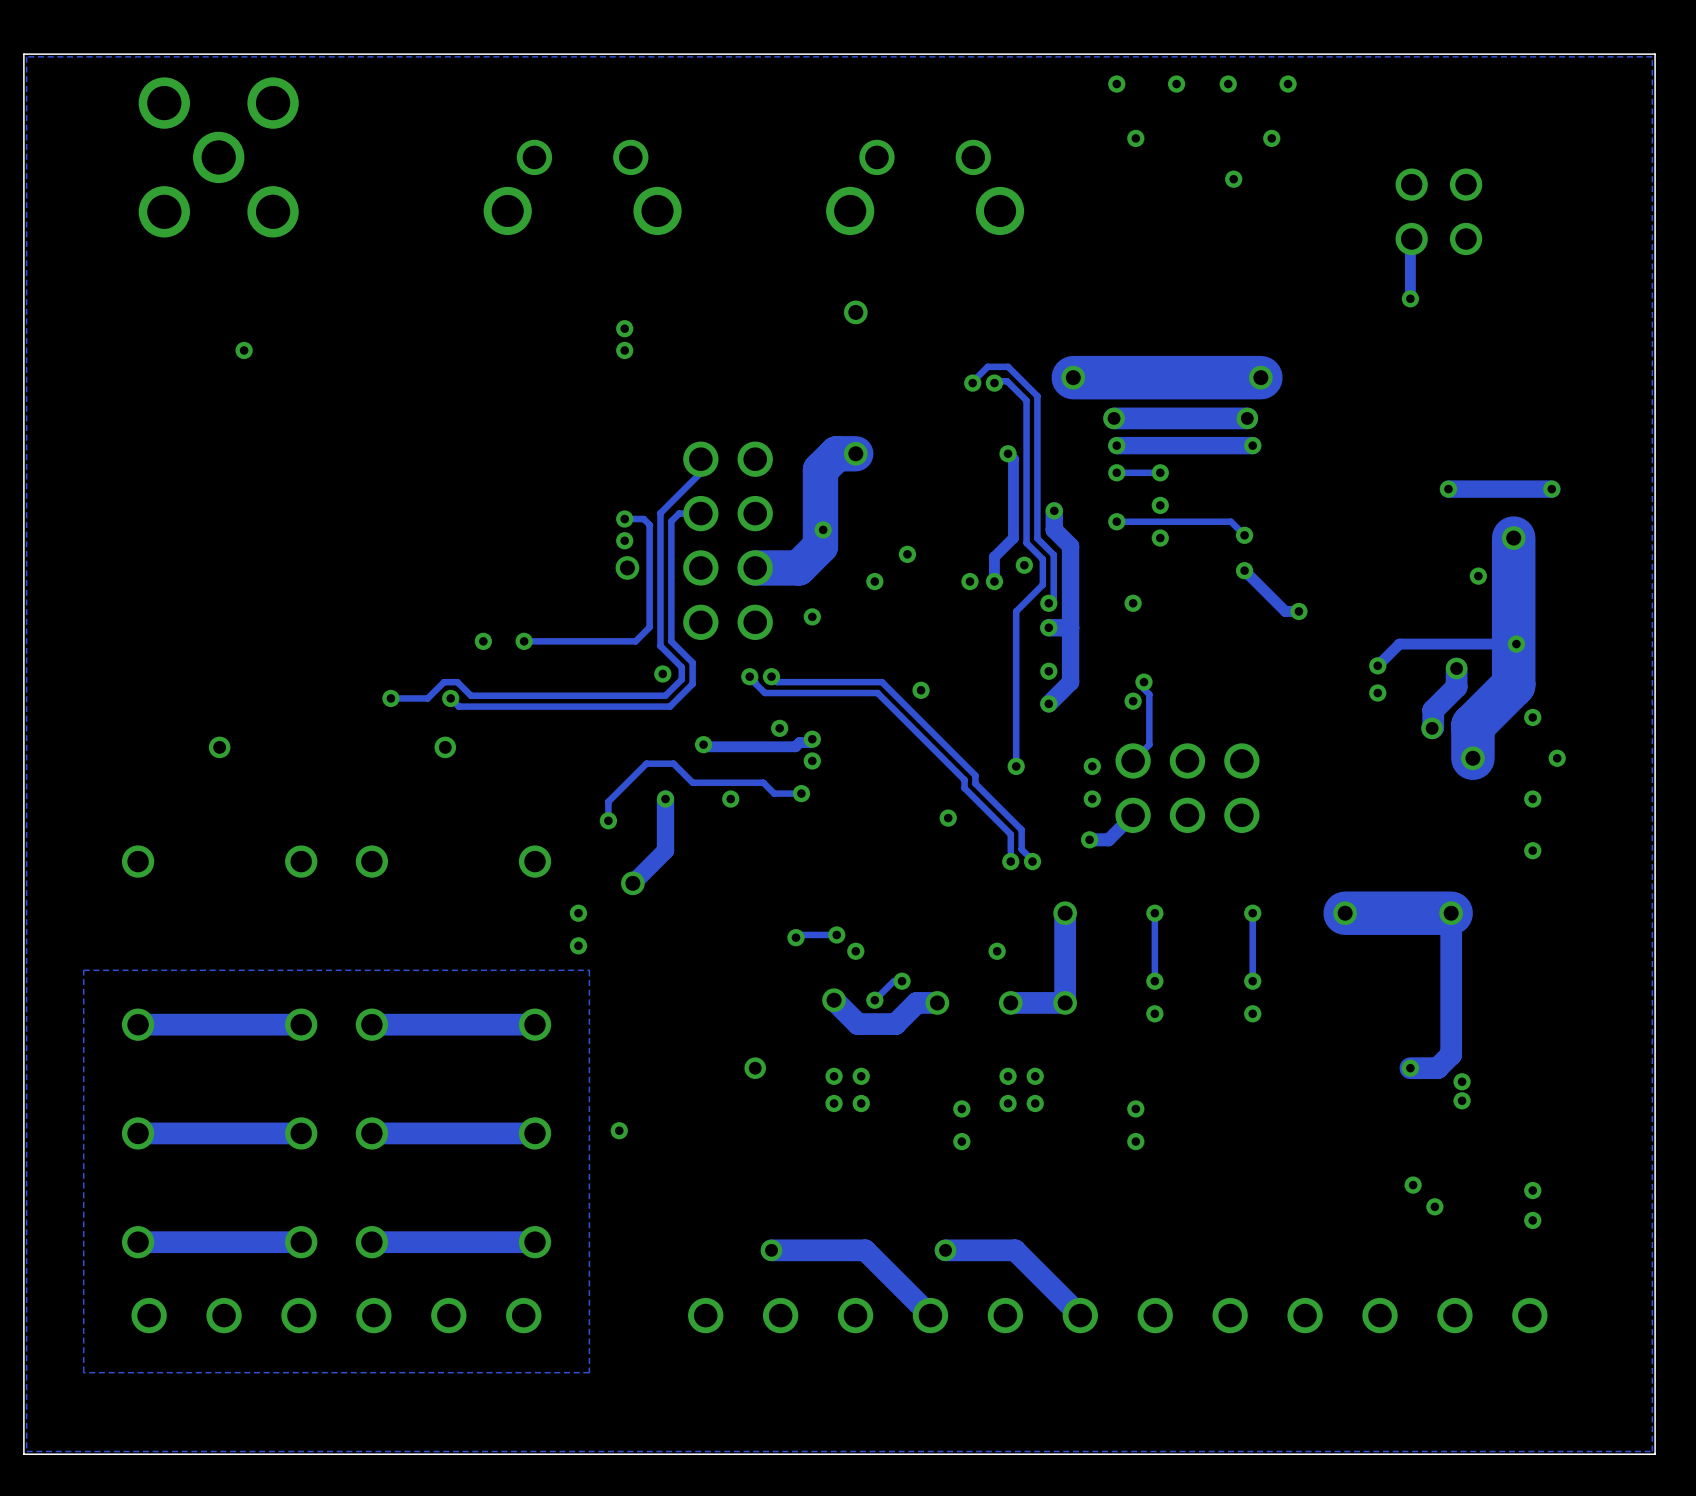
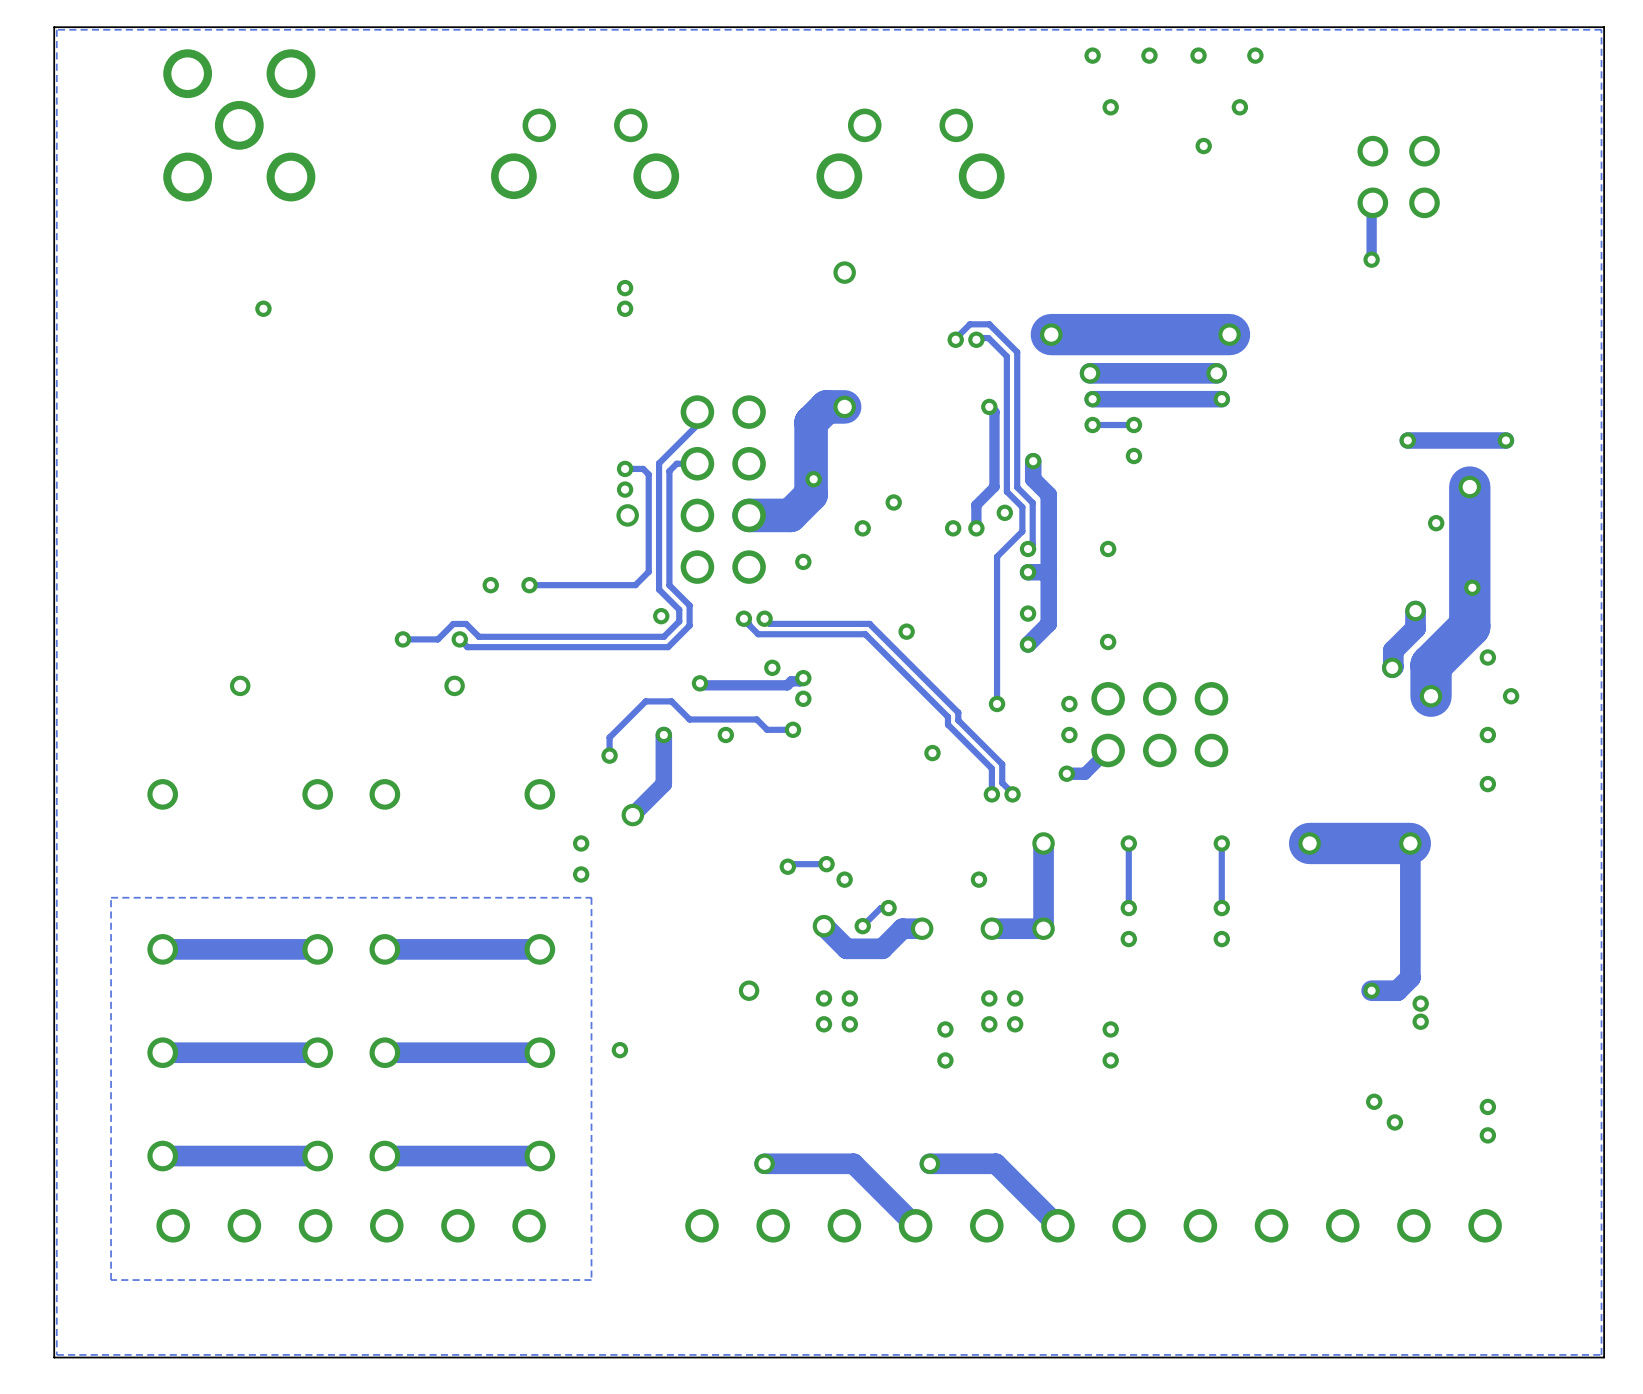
track: (1116, 521) (1230, 521) (1244, 535) -> none
via: (1116, 521) -> none
via: (1244, 535) -> none
via: (1160, 538) -> none
track: (1244, 570) (1285, 611) (1298, 611) -> none
via: (1244, 570) -> none
via: (1298, 611) -> none
track: (1516, 644) (1399, 644) (1377, 665) -> none
via: (1377, 665) -> none
track: (1143, 682) (1143, 689) (1149, 694) (1149, 744) (1133, 760) -> none
via: (1143, 682) -> none
via: (1377, 693) -> none

